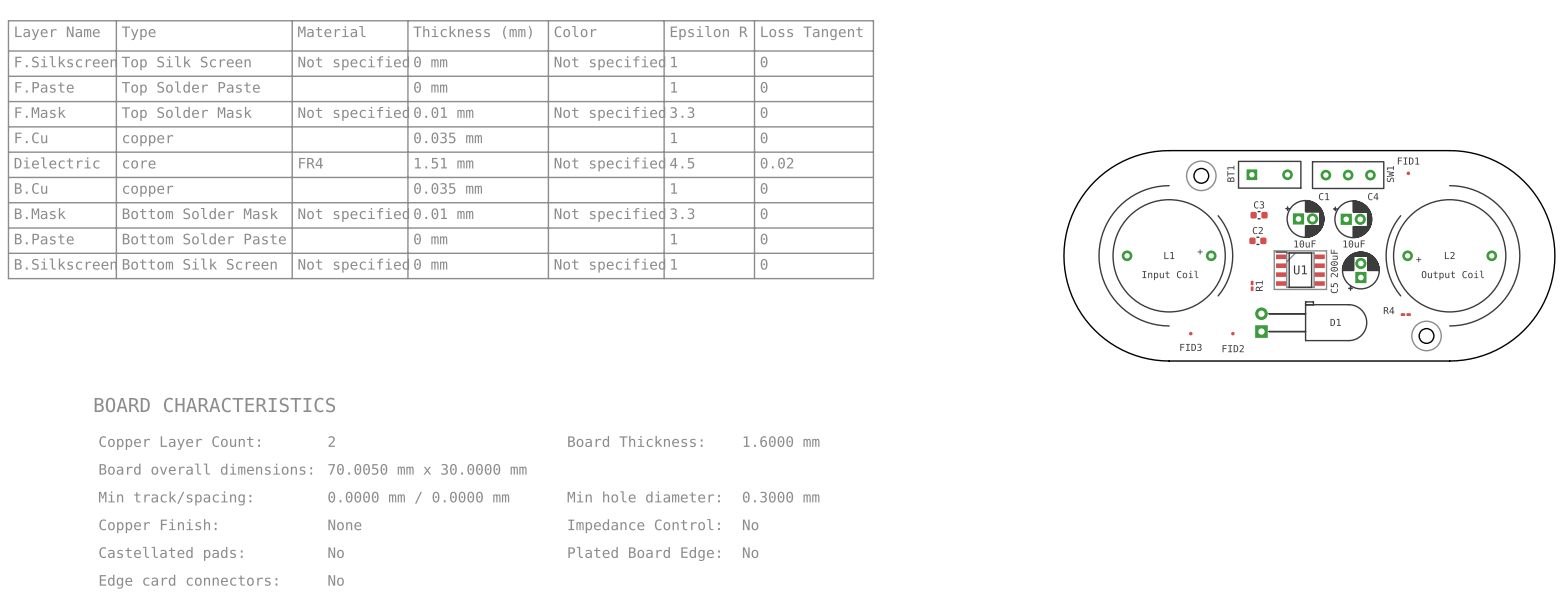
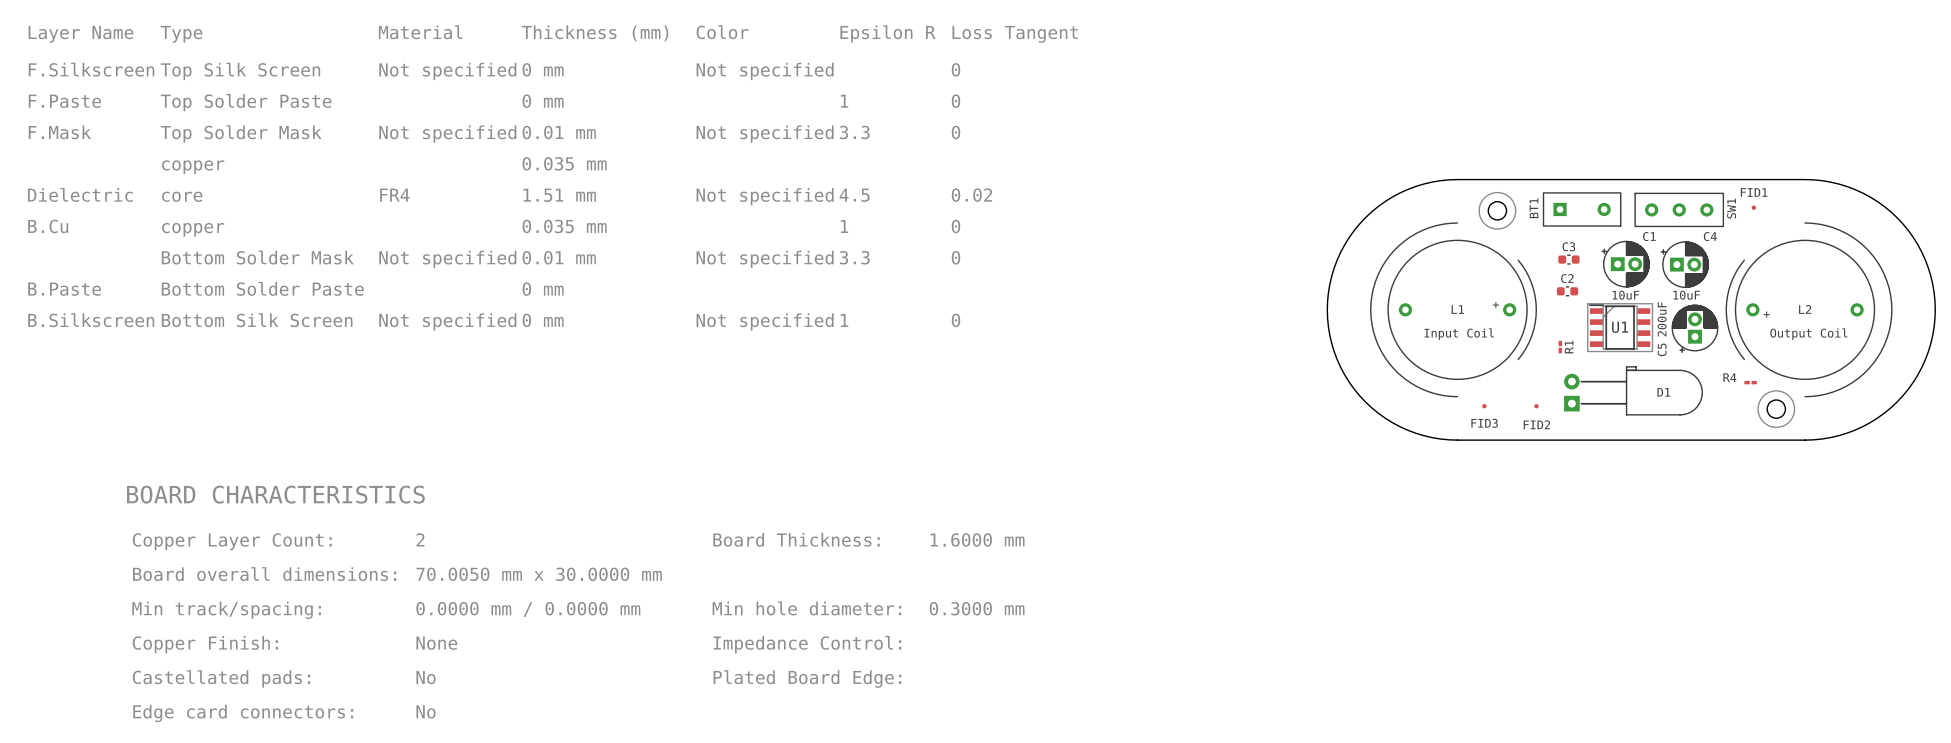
line: (8, 20) (8, 278) (873, 278) (873, 20) (8, 20) -> none
line: (116, 20) (116, 278) -> none
line: (292, 20) (292, 278) -> none
line: (407, 20) (407, 278) -> none
line: (548, 20) (548, 278) -> none
line: (664, 20) (664, 278) -> none
line: (754, 20) (754, 278) -> none
line: (8, 50) (873, 50) -> none
text: 1 (674, 62) -> none
line: (8, 76) (873, 76) -> none
line: (8, 101) (873, 101) -> none
line: (8, 126) (873, 126) -> none
text: F.Cu (31, 137) -> none
text: 1 (674, 137) -> none
text: 0 (764, 137) -> none
line: (8, 152) (873, 152) -> none
line: (8, 177) (873, 177) -> none
line: (8, 202) (873, 202) -> none
text: B.Mask (40, 213) -> none
line: (8, 228) (873, 228) -> none
text: 1 (674, 239) -> none
text: 0 (764, 239) -> none
line: (8, 253) (873, 253) -> none
text: No (750, 524) -> none
text: No (750, 552) -> none

